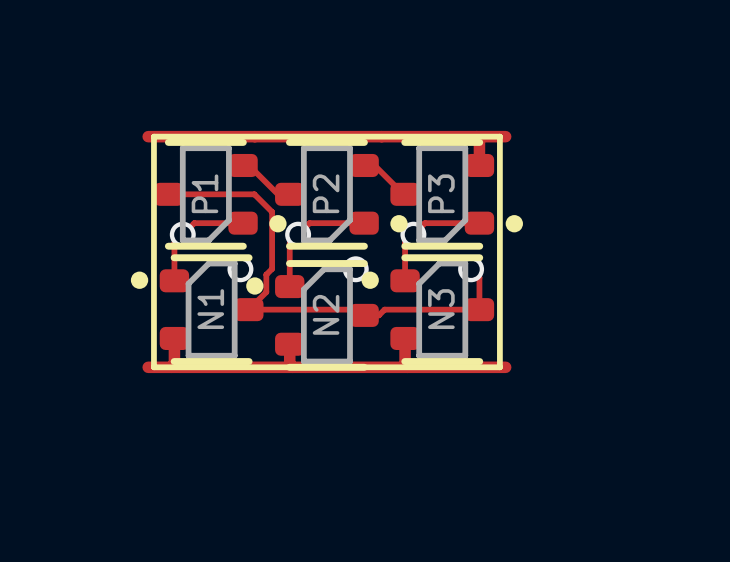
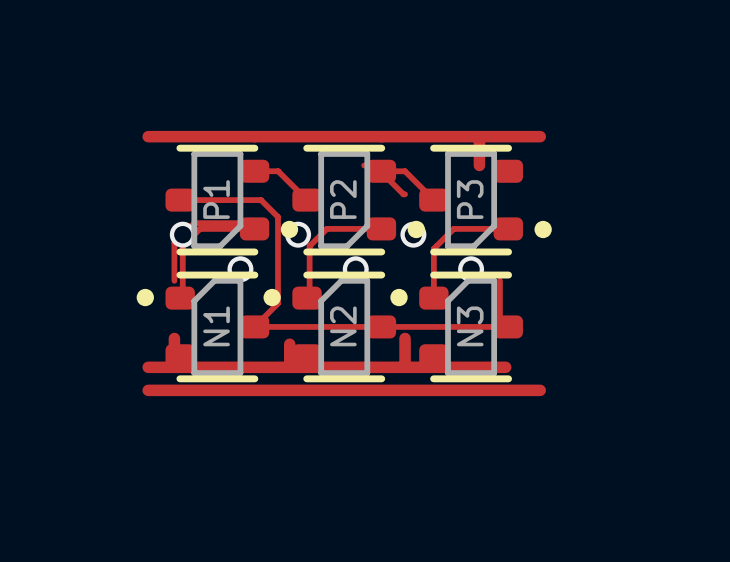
line: (153, 136) (499, 136) (499, 367) (153, 367) (153, 136) -> none
top track: none -> (505, 136) (540, 136)
top track: (249, 165) (277, 194) (289, 194) -> none
top track: none -> (254, 171) (278, 171) (307, 200)
top track: none -> (381, 171) (405, 171) (433, 200)
top track: (168, 194) (254, 194) (272, 212) (272, 268) (266, 274) (266, 292) (248, 309) (358, 309) (364, 315) (378, 315) (384, 309) (479, 309) (479, 277) (471, 269) -> none
P1 position: (220, 194) -> (231, 200)
P2 position: (341, 194) -> (358, 200)
P3 position: (456, 194) -> (485, 200)
top track: none -> (180, 200) (261, 200) (277, 216) (277, 303) (254, 326) (508, 326) (499, 318) (499, 280)
top track: (364, 223) (309, 223) (289, 243) (289, 280) -> none
top track: (479, 223) (424, 223) (405, 243) (405, 280) -> none
top track: none -> (254, 228) (200, 228) (182, 246) (182, 295) (180, 298)
top track: none -> (381, 228) (326, 228) (309, 246) (309, 295) (307, 298)
top track: none -> (508, 228) (453, 228) (433, 248) (433, 298)
N1 position: (197, 309) -> (202, 326)
N3 position: (427, 309) -> (456, 326)
N2 position: (312, 315) -> (329, 326)
top track: none -> (148, 390) (540, 390)

